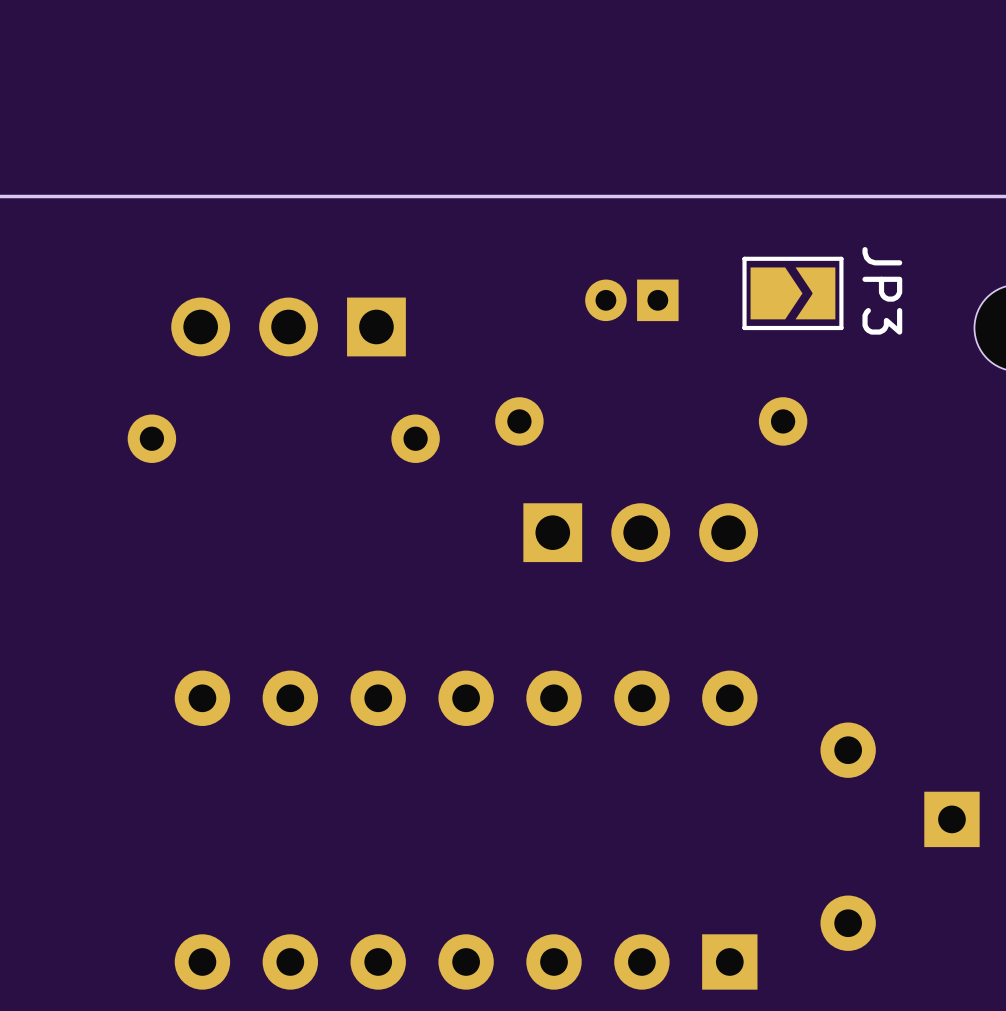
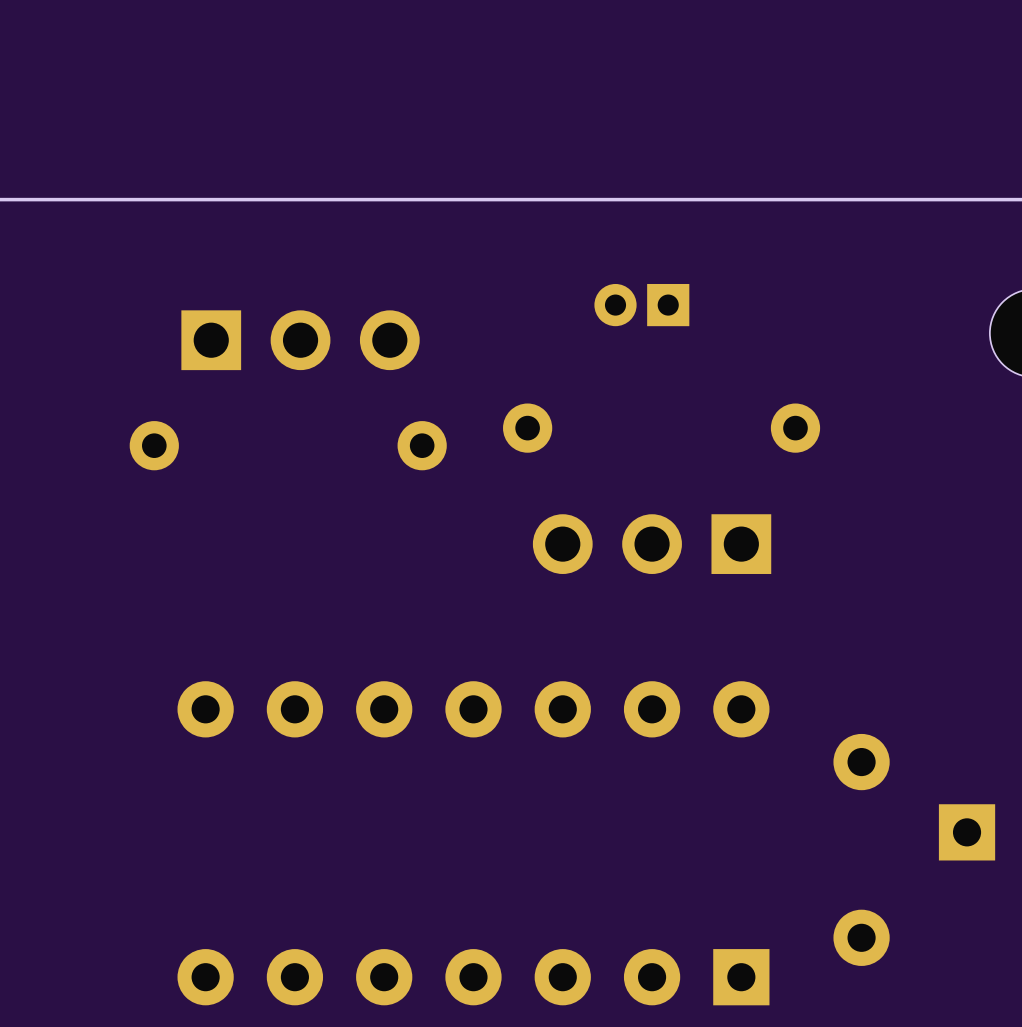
JP3: (792, 293) -> none
part rotation: 0° (288, 326) -> 180° (300, 340)
part rotation: 0° (640, 532) -> 180° (652, 544)

